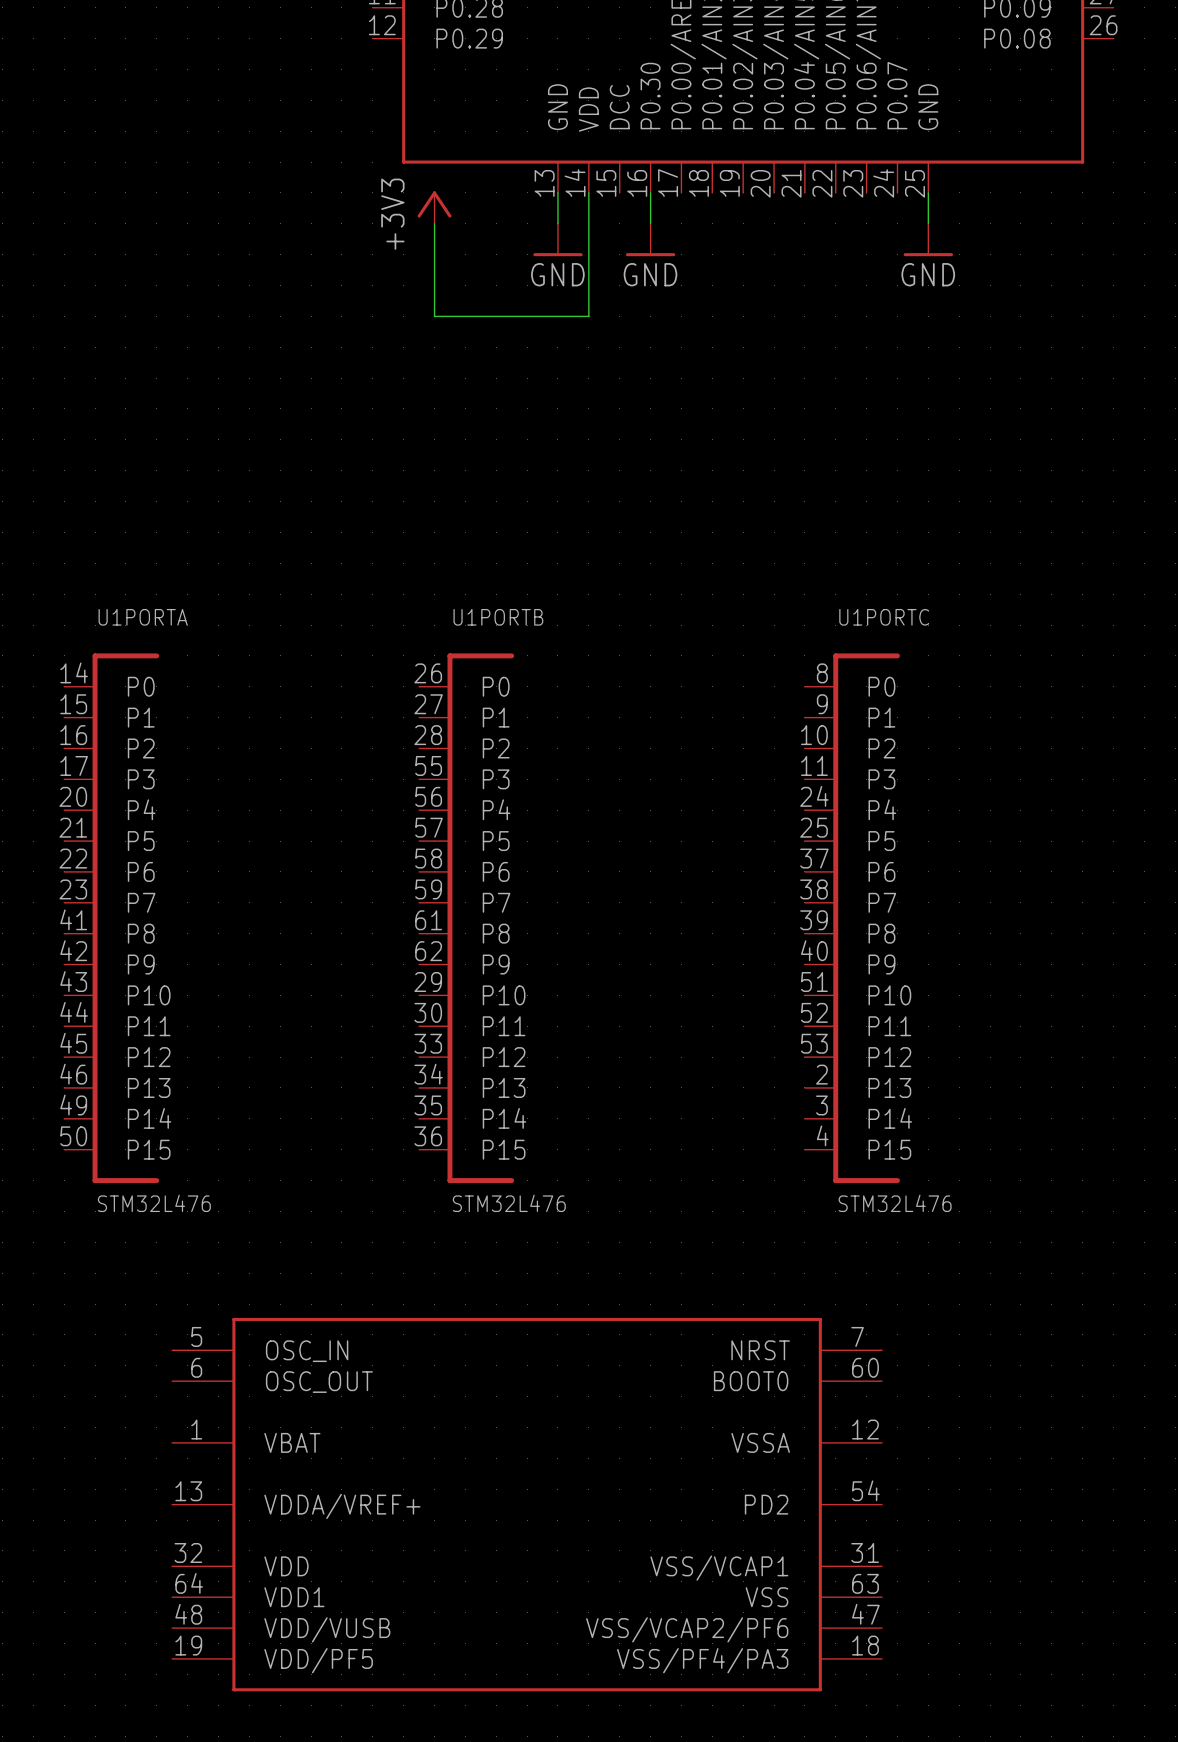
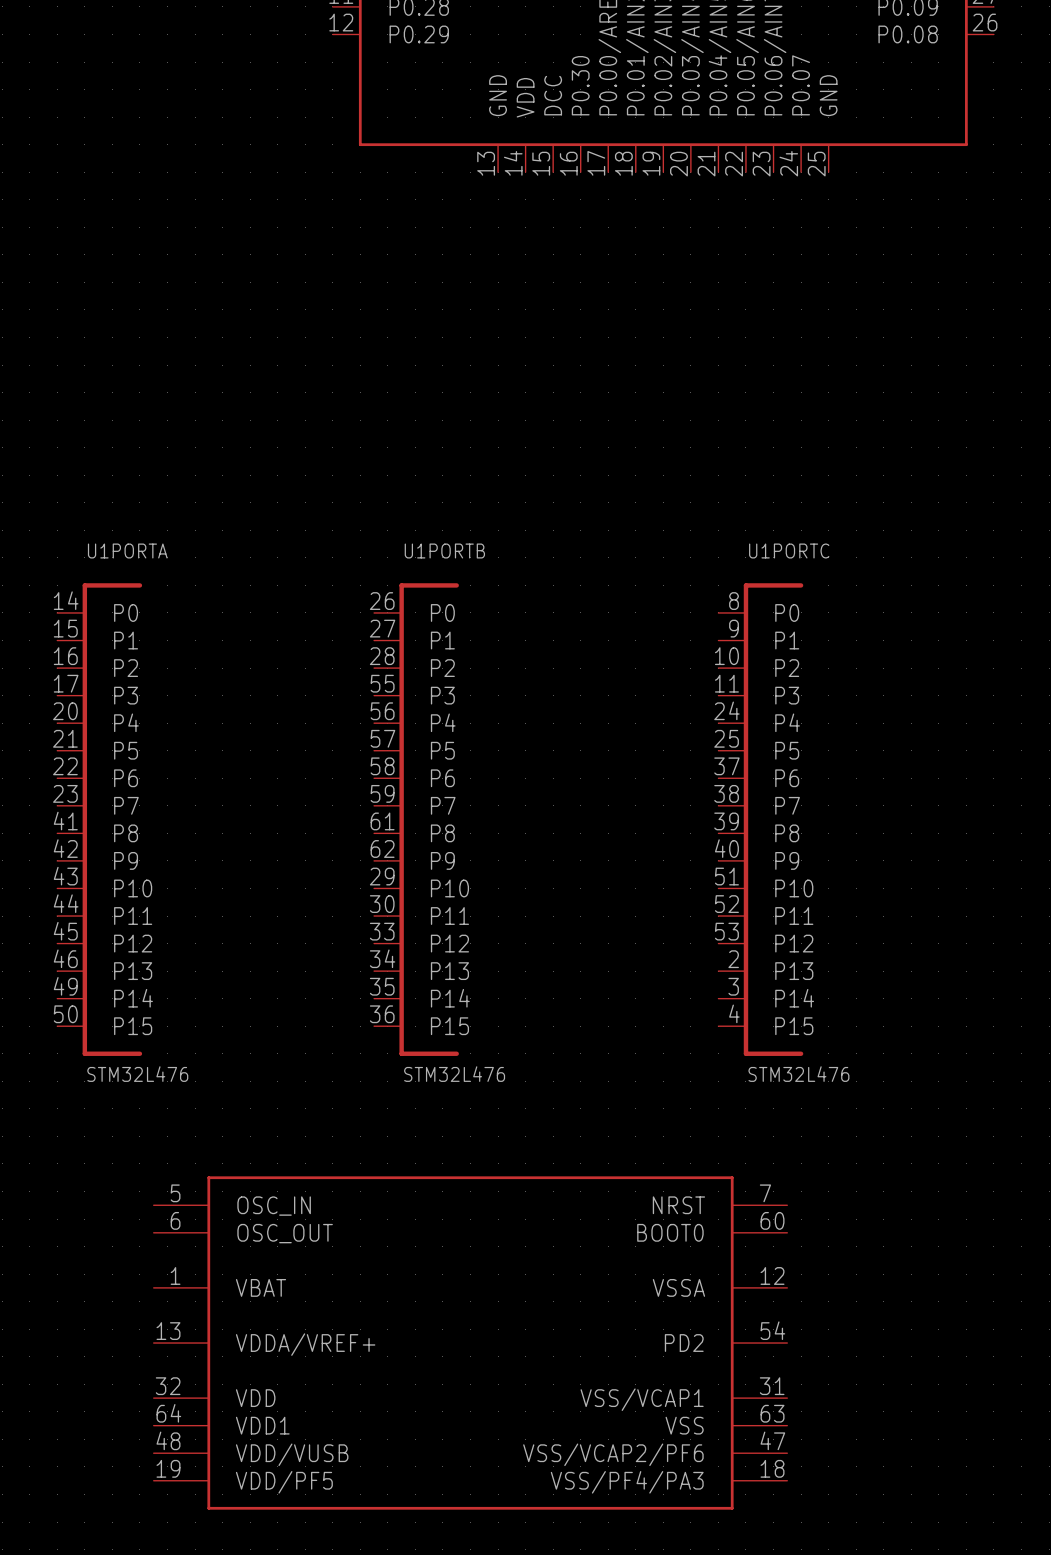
wire: (557, 192) (557, 223) -> none
wire: (588, 192) (588, 316) (434, 316) (434, 223) -> none
wire: (650, 192) (650, 223) -> none
wire: (928, 192) (928, 223) -> none
power symbol: +3V3 (434, 207) -> none
power symbol: GND (557, 240) -> none
power symbol: GND (650, 240) -> none
power symbol: GND (928, 240) -> none

